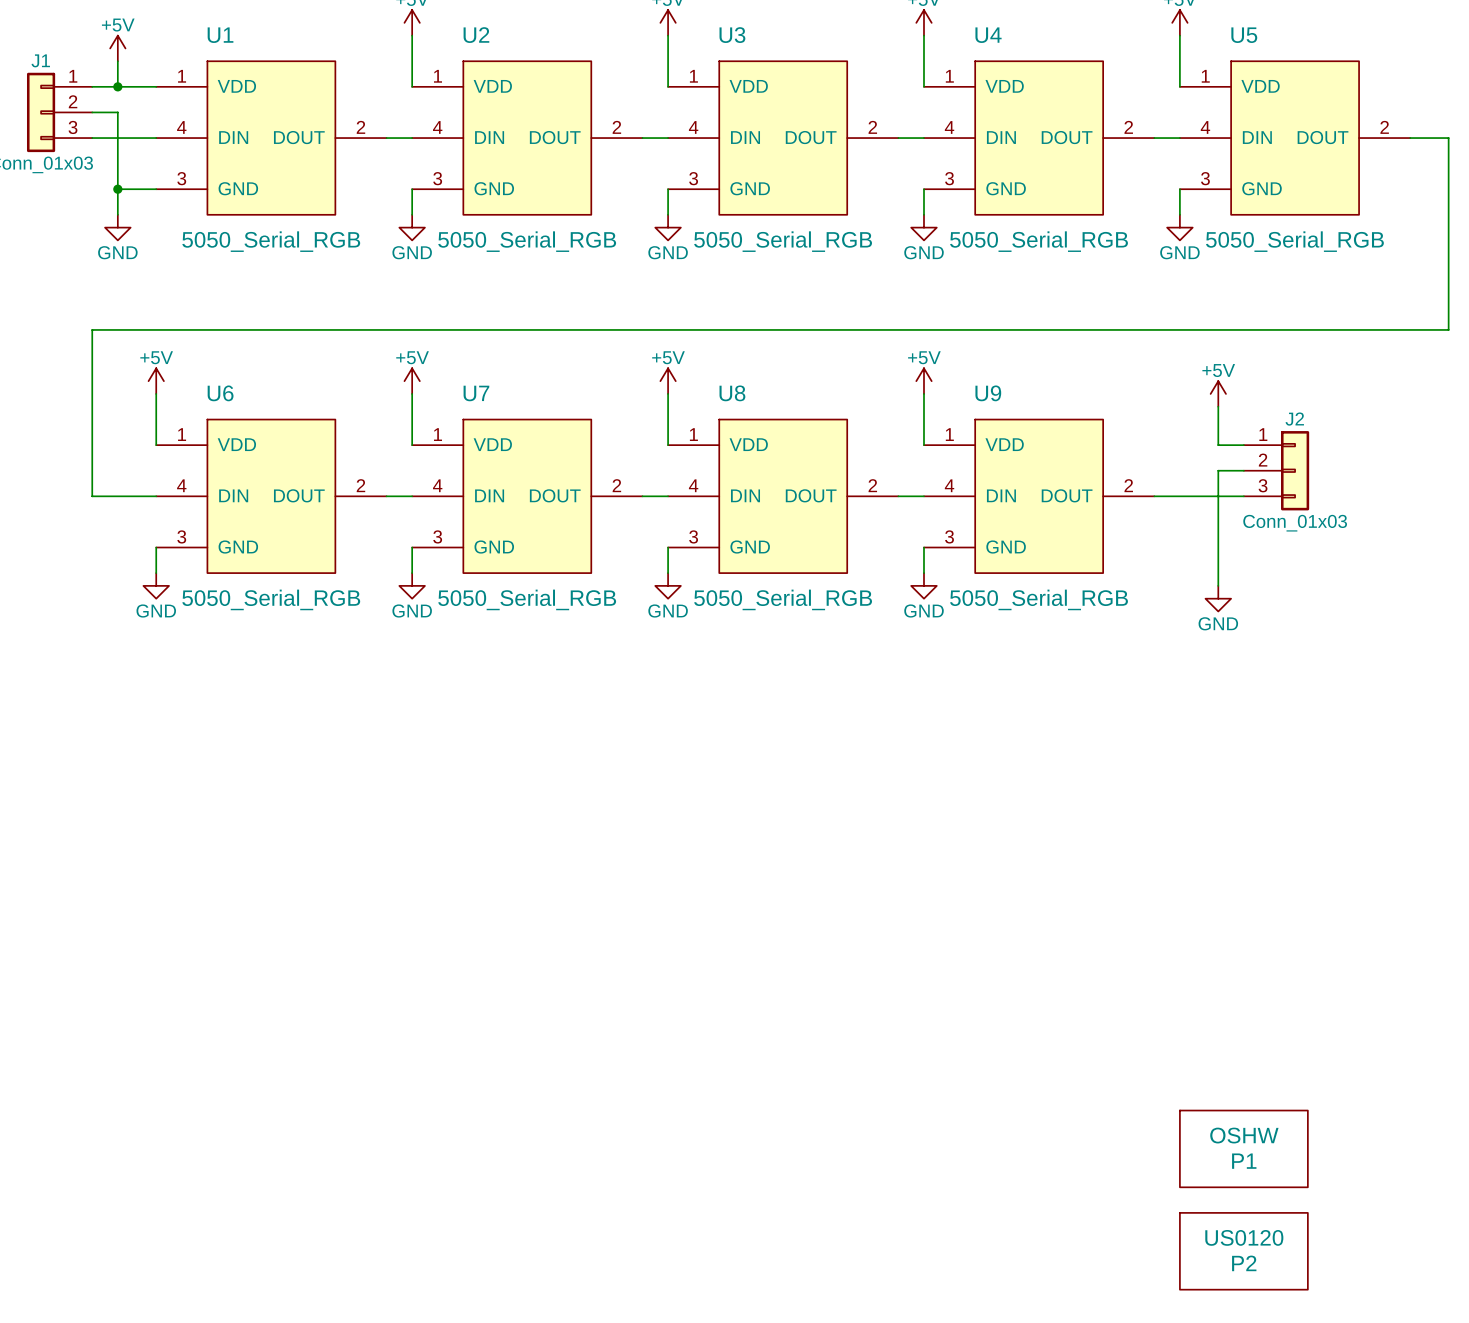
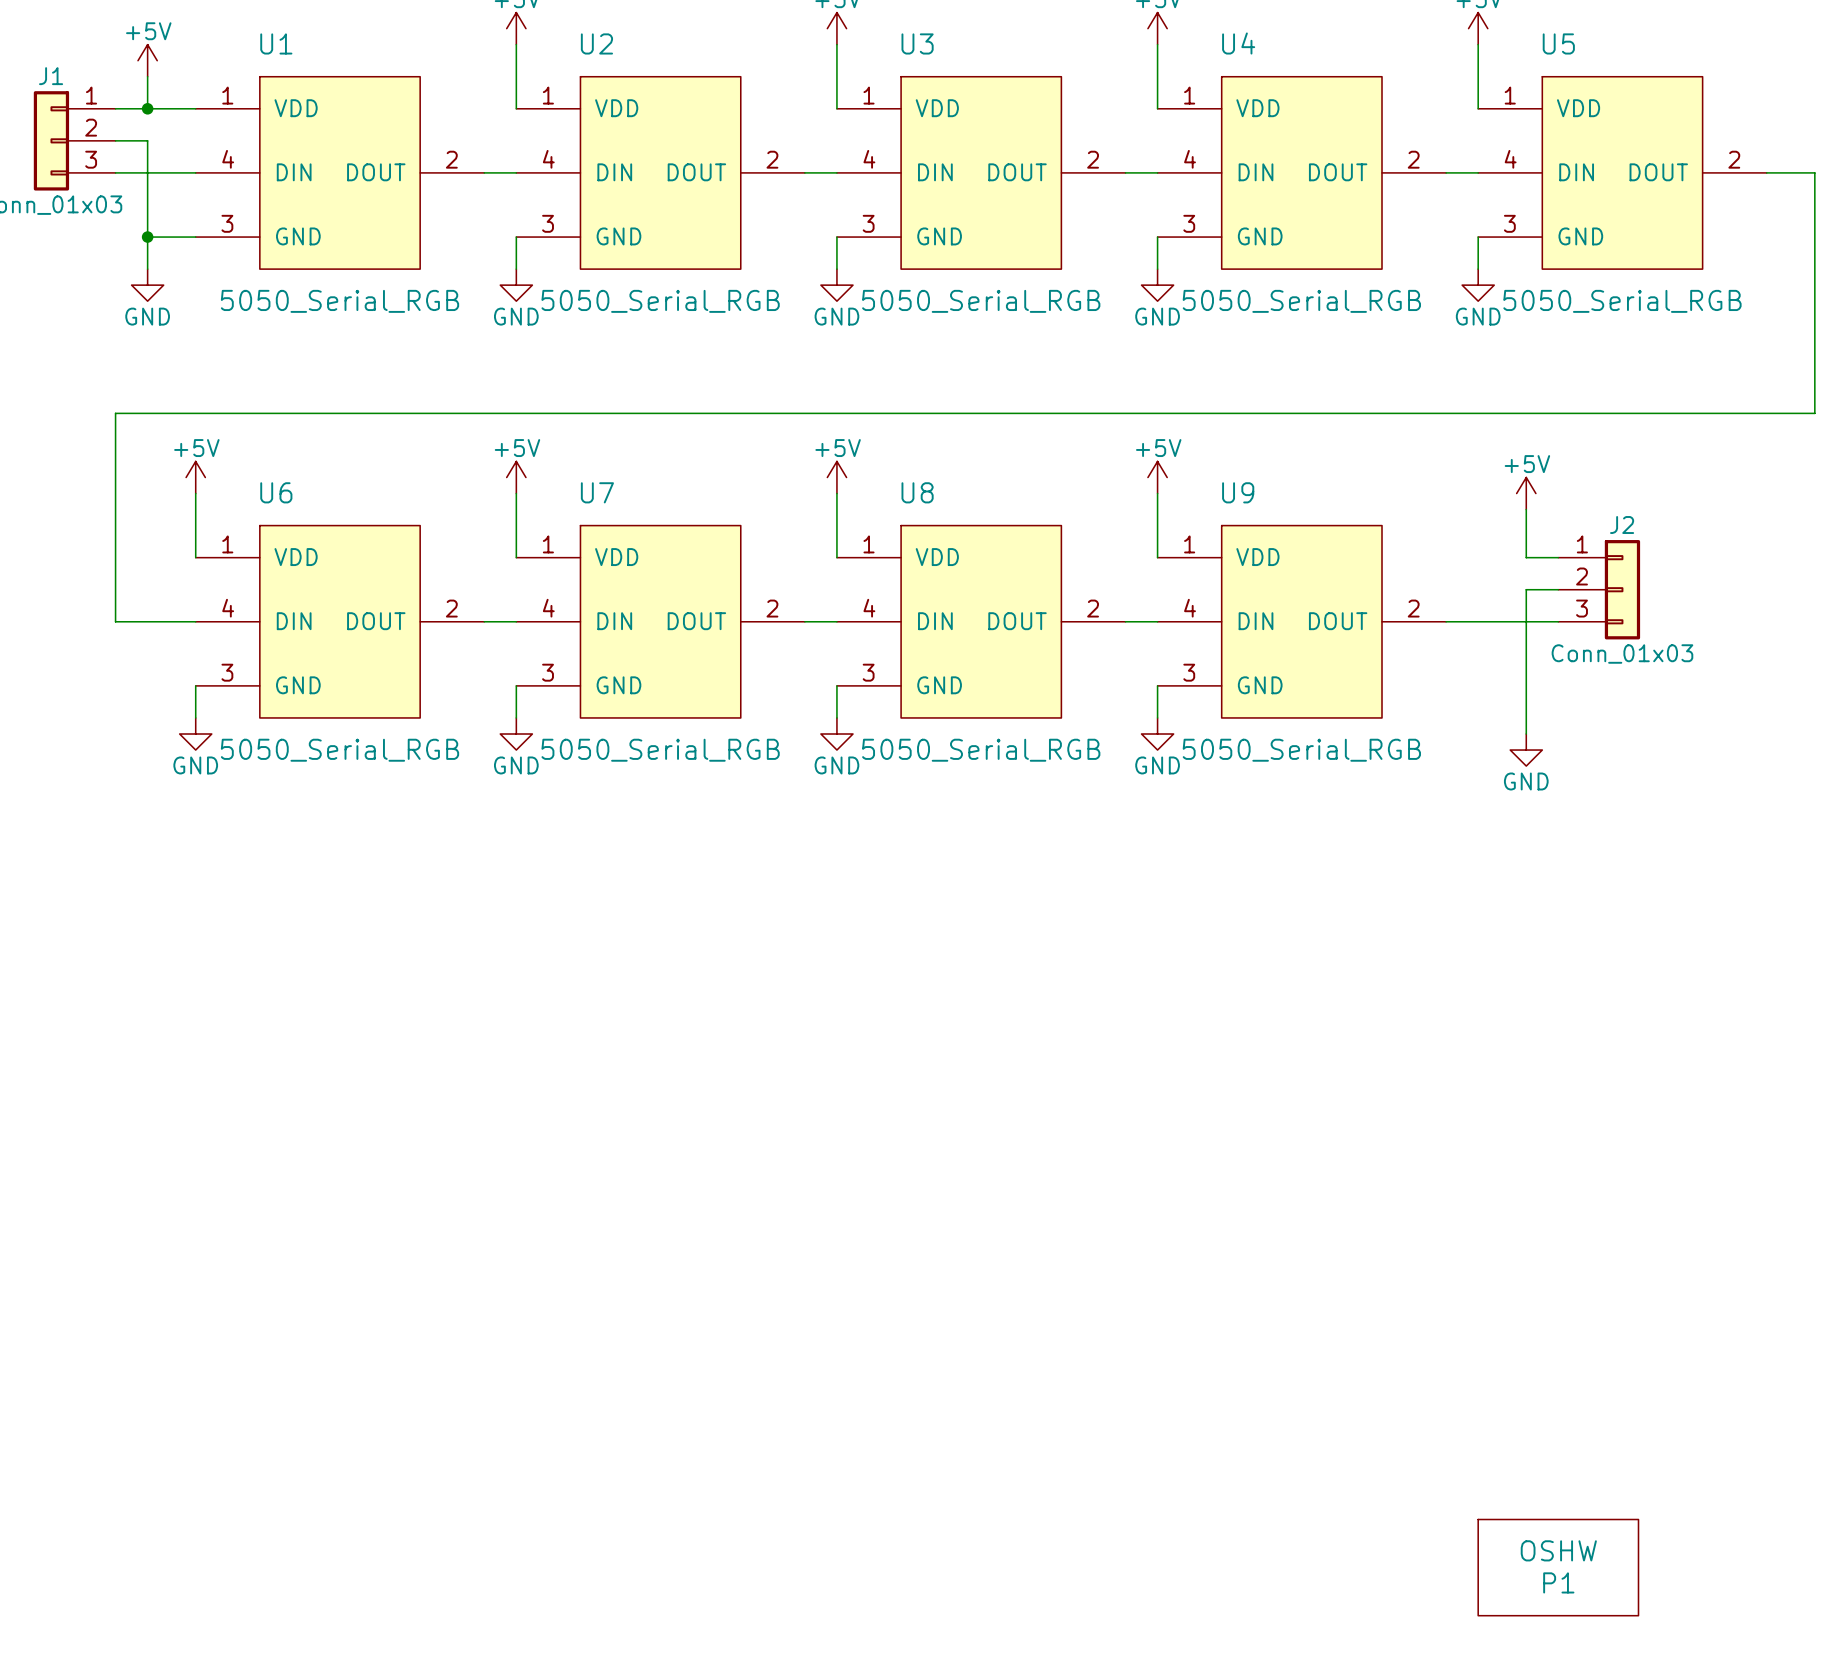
P1: OSHW (1243, 1148) -> none
P2 value: US0120 (1244, 1237) -> OSHW (1558, 1550)
P2 name: P2 (1244, 1263) -> P1 (1558, 1582)

